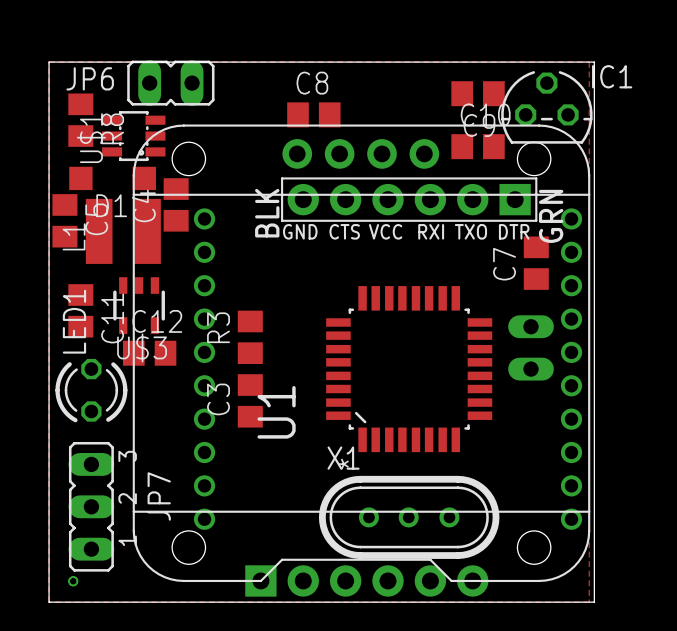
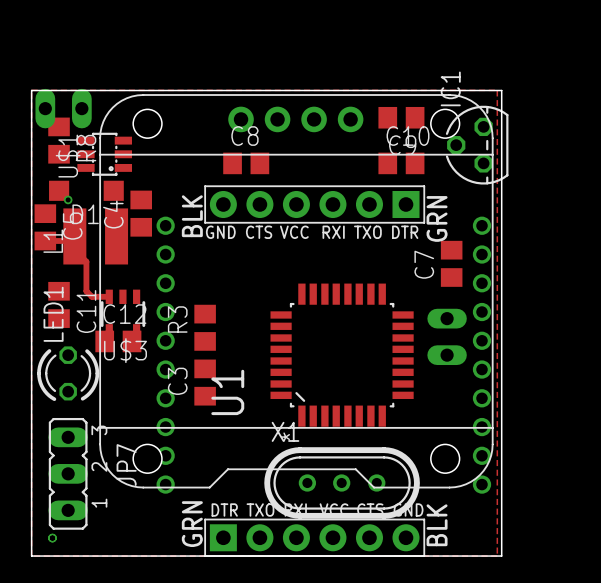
JP6 side: top (170, 83) -> bottom (63, 108)
IC1 rotation: 0° (546, 107) -> 90° counterclockwise (477, 145)
C8 position: (313, 114) -> (246, 163)
via: none -> (68, 199)
part position: (409, 199) -> (314, 204)
track: none -> (45, 240) (65, 240) (86, 261) (86, 291) (91, 296) (109, 296)
U$3 position: (139, 305) -> (122, 314)
part position: (361, 353) -> (296, 291)
part side: bottom (366, 580) -> top (314, 537)

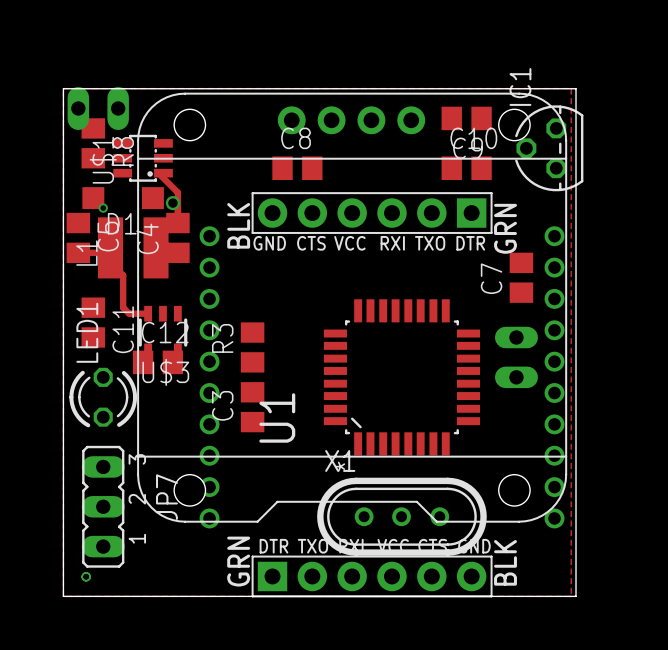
track: none -> (158, 173) (177, 192) (177, 223)
via: none -> (172, 203)
C4 position: (141, 213) -> (177, 237)

